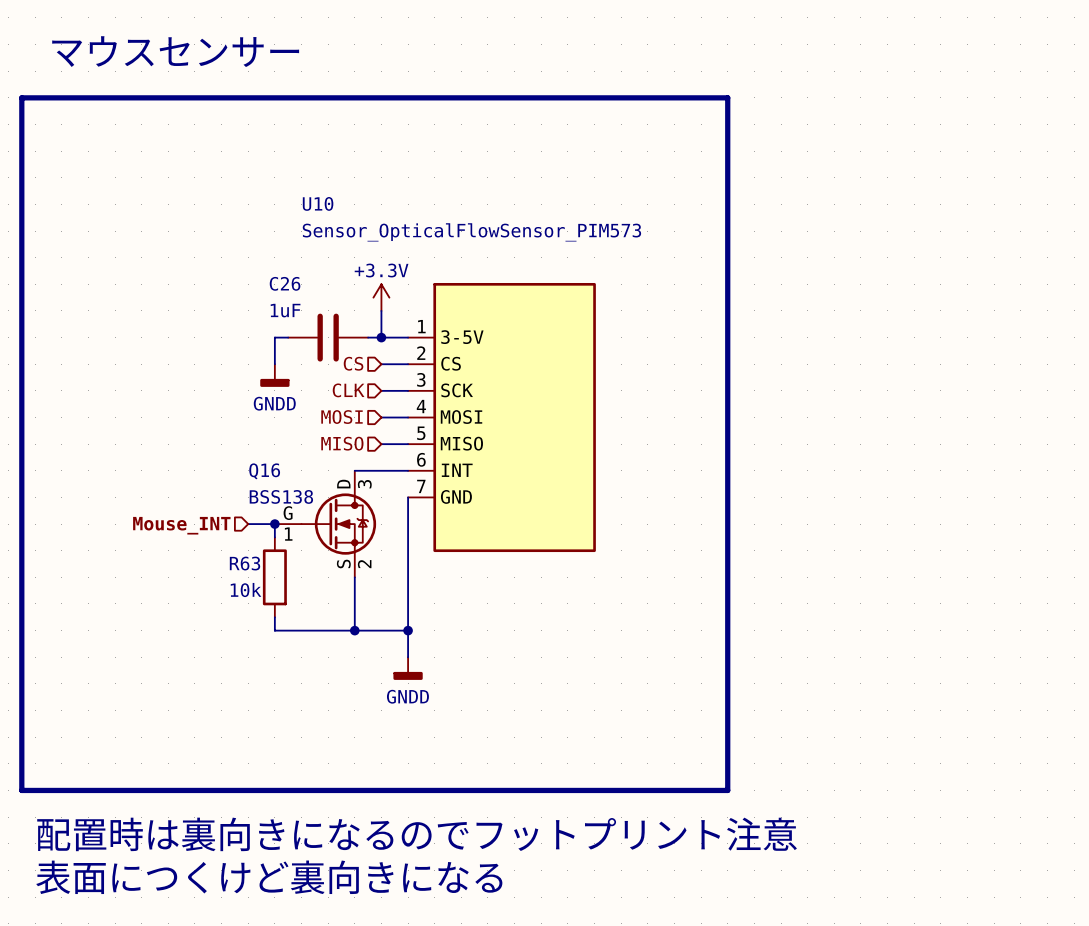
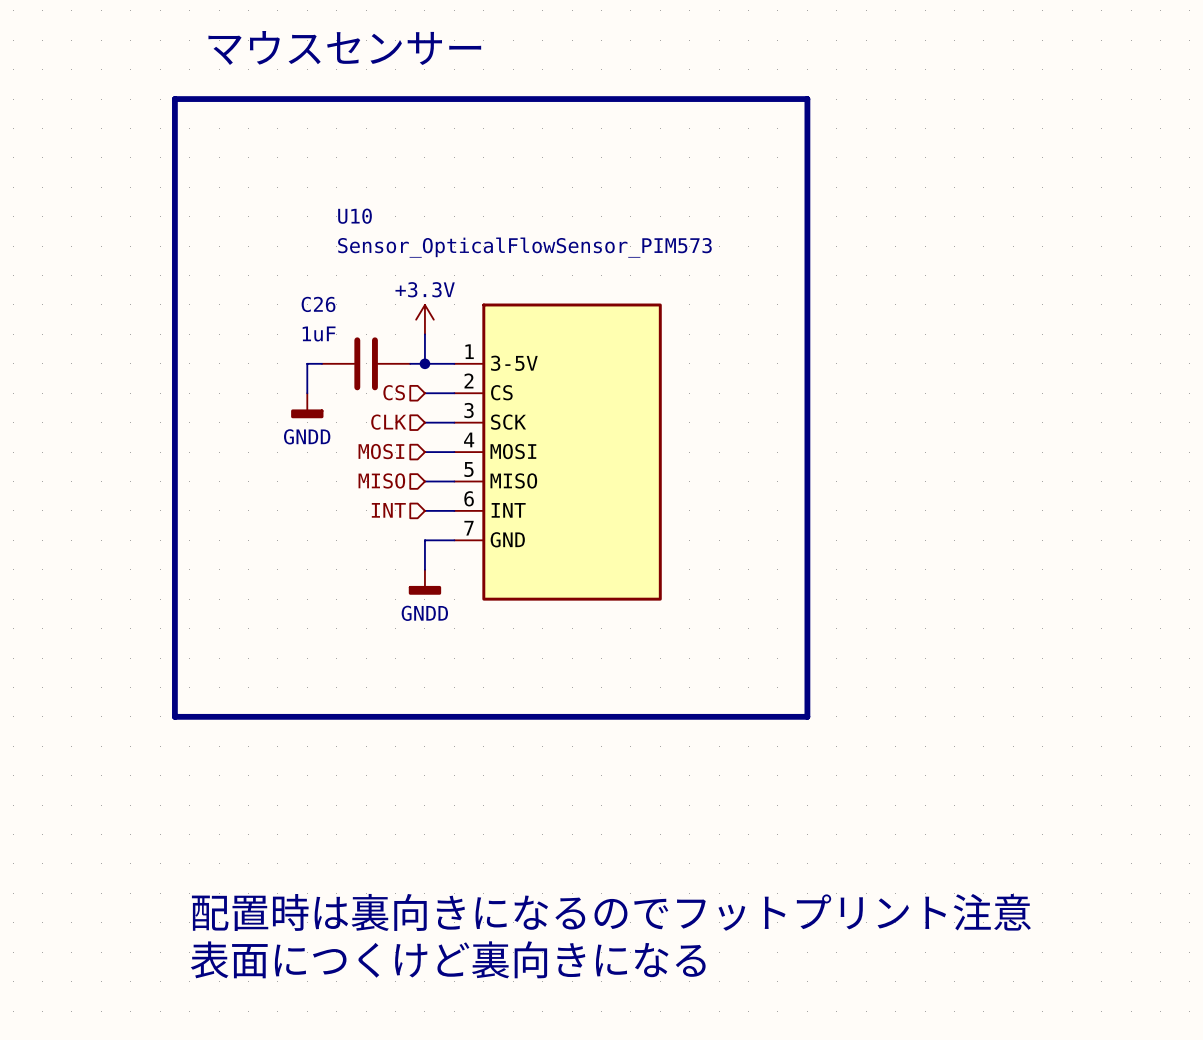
text position: マウスセンサー (175, 51) -> マウスセンサー (344, 47)
line: (155, 97) (21, 97) (21, 790) (727, 790) (727, 657) -> (174, 99) (174, 716) (807, 716)
hierarchical label: none -> INT (388, 510)
wire: (354, 470) (381, 470) -> none
wire: (408, 497) (408, 657) -> (454, 540) (424, 540) (424, 569)
wire: (248, 524) (274, 524) (274, 537) -> none
junction: (274, 524) -> none
Q16: BSS138 (325, 524) -> none
hierarchical label: Mouse_INT (181, 525) -> none
R63: 10k (274, 577) -> none
wire: (354, 577) (354, 630) -> none
wire: (274, 617) (274, 630) (408, 630) -> none
junction: (354, 630) -> none
junction: (408, 630) -> none
power symbol position: GNDD (408, 668) -> GNDD (424, 582)
text position: 配置時は裏向きになるのでフットプリント注意 (417, 834) -> 配置時は裏向きになるのでフットプリント注意 (611, 912)
text position: 表面につくけど裏向きになる (269, 877) -> 表面につくけど裏向きになる (448, 959)

